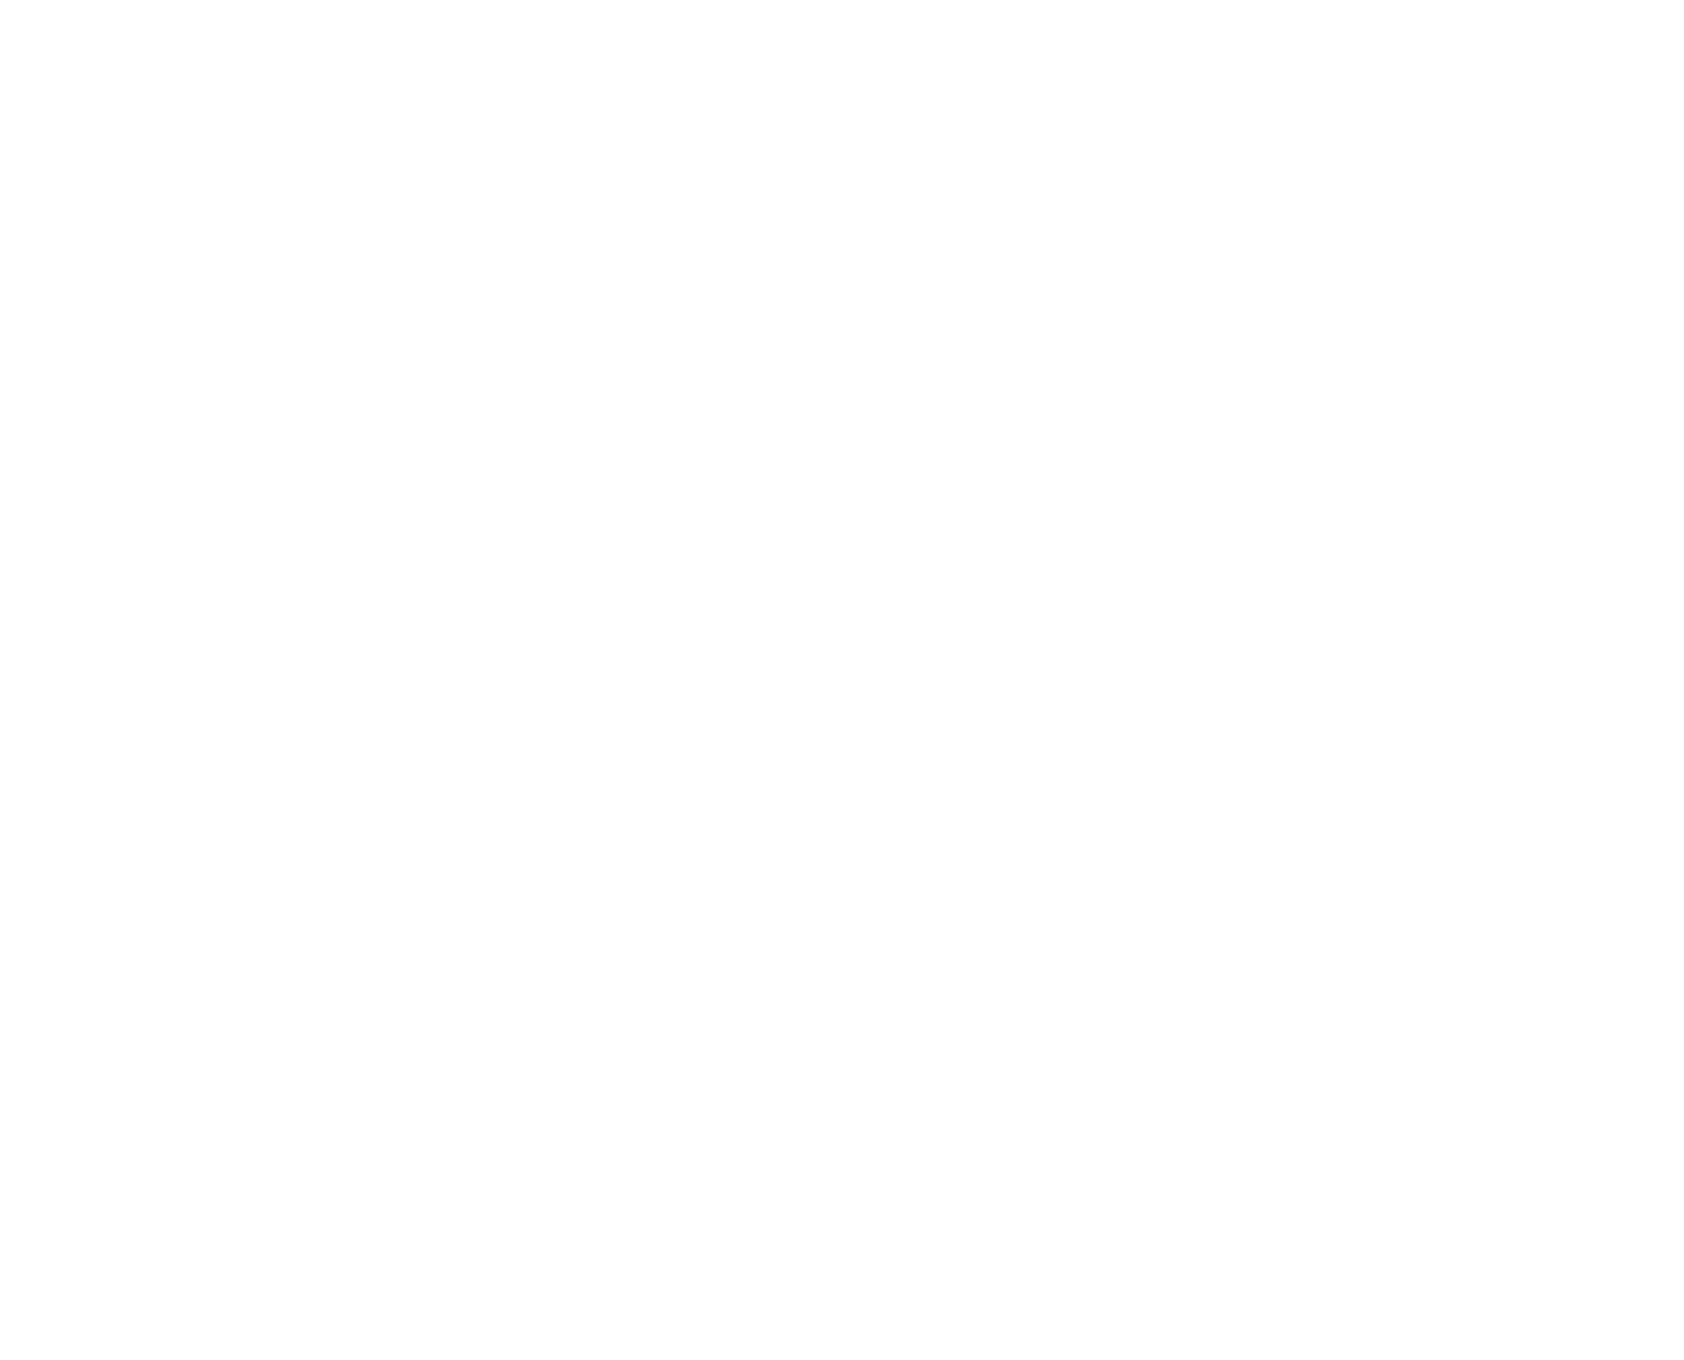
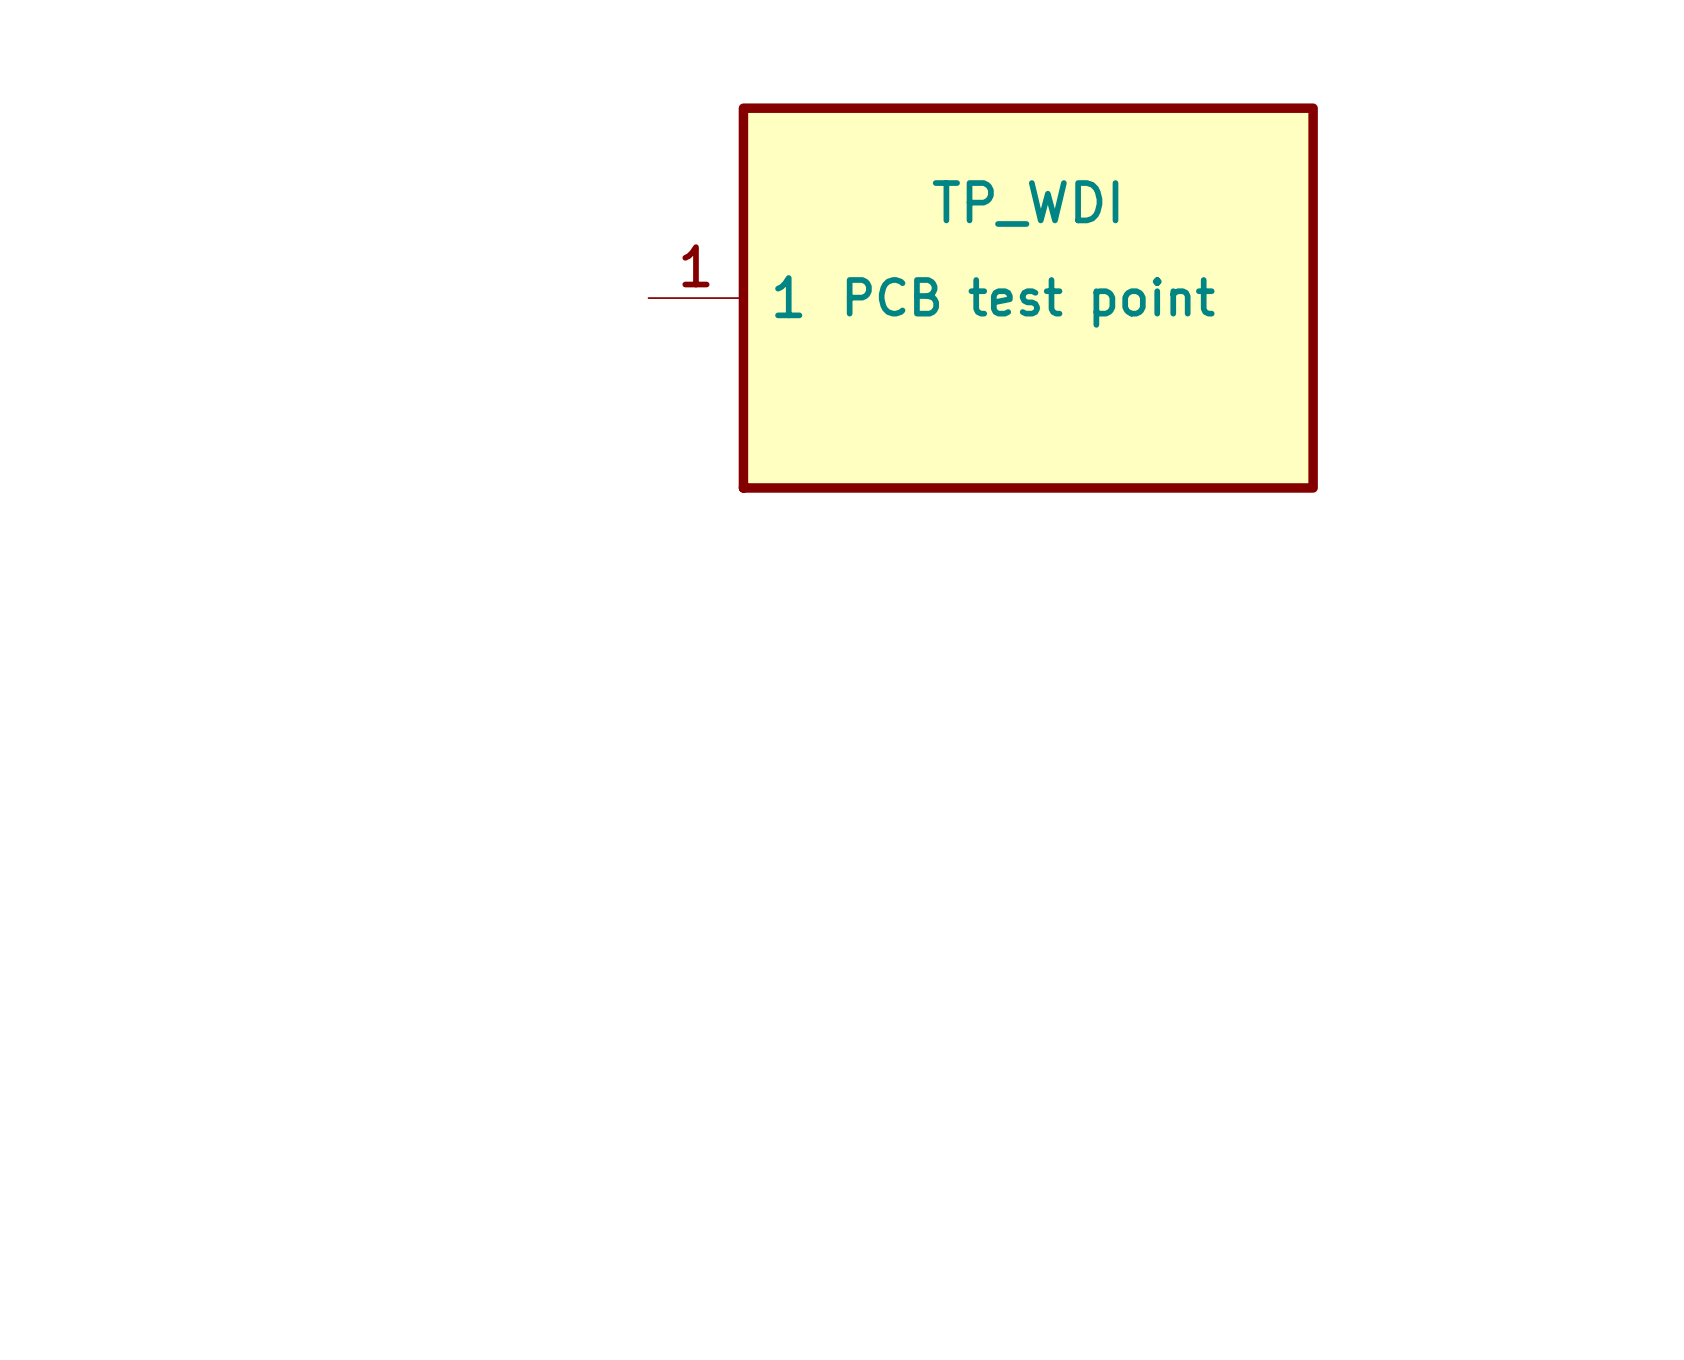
TP_WDI: none -> PCB test point (983, 298)

